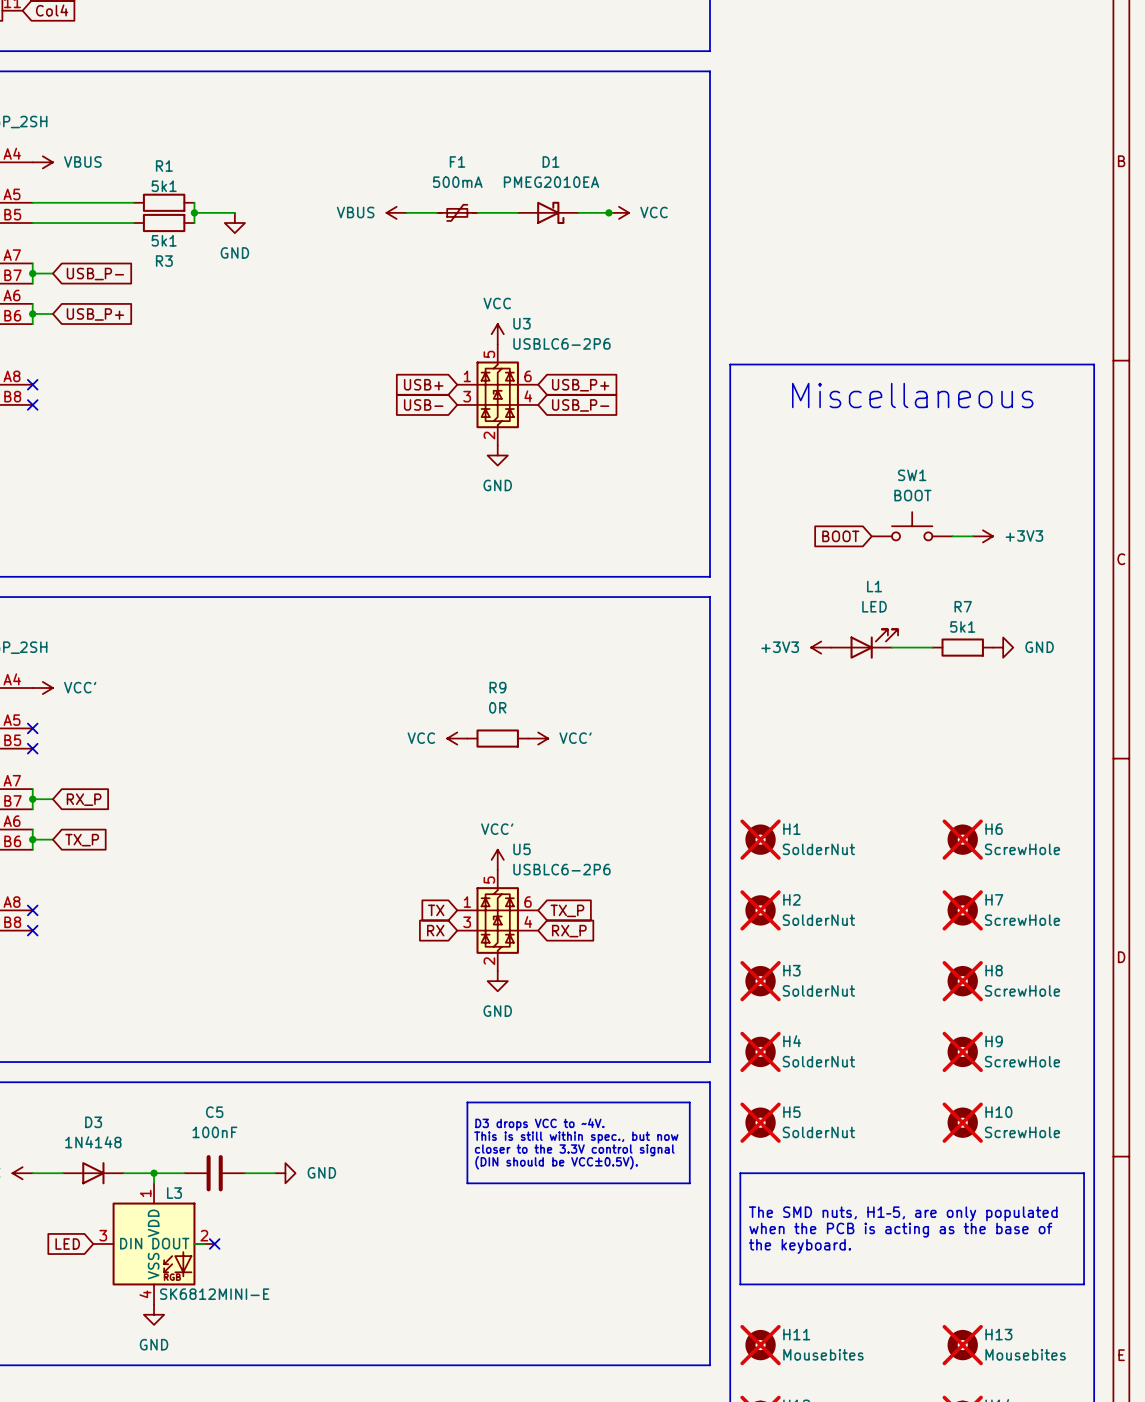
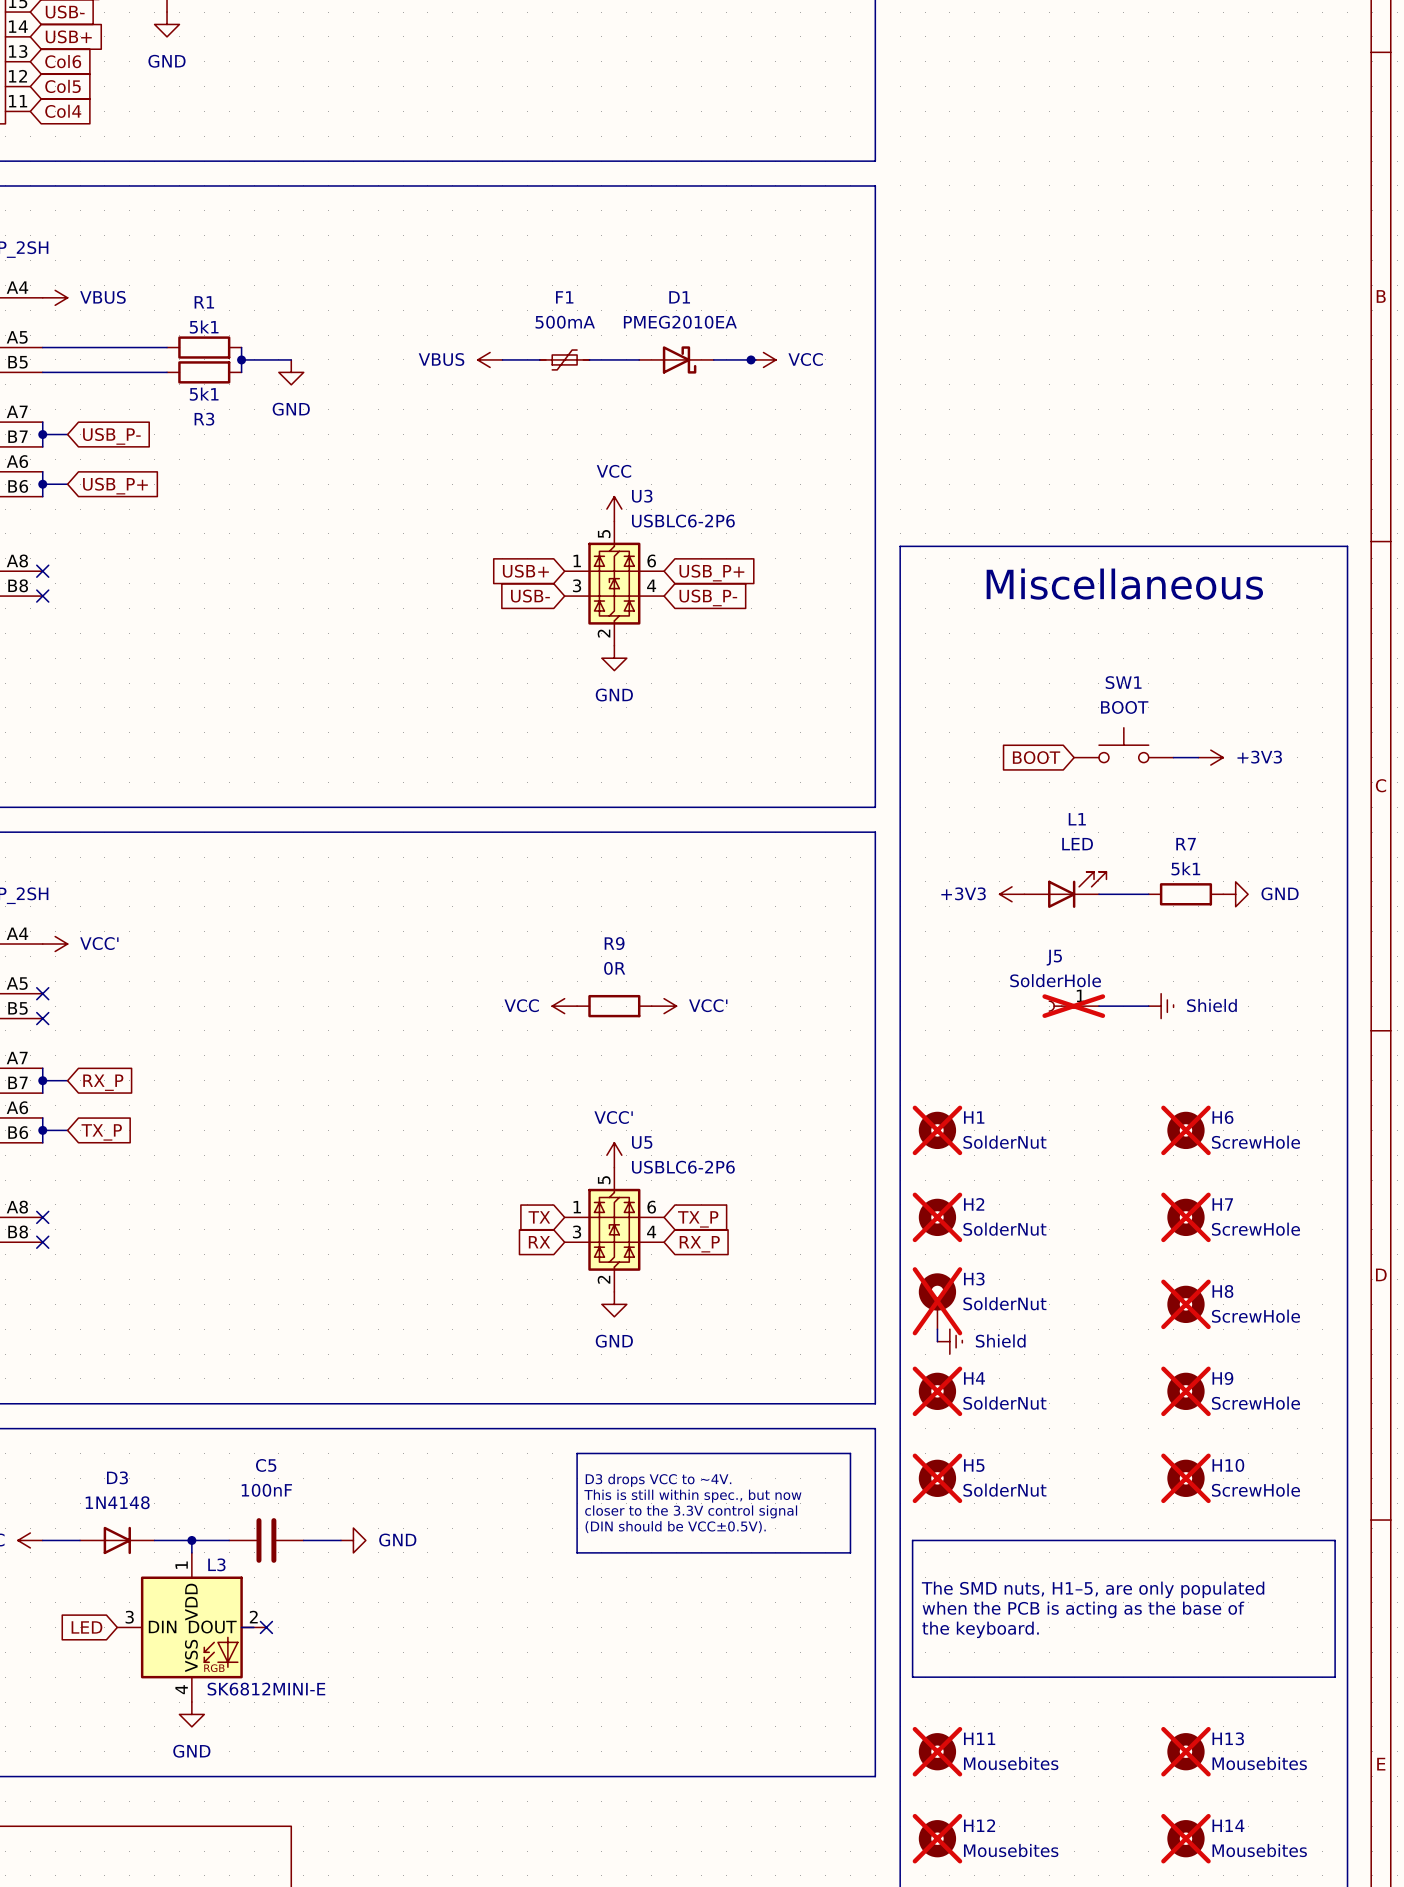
J5: none -> SolderHole (1073, 1006)
wire: none -> (1098, 1006) (1148, 1006)
power symbol: none -> Shield (1161, 1006)
H3 symbol: [745, 966, 776, 997] -> [918, 1273, 957, 1330]
wire: none -> (937, 1329) (937, 1341)
power symbol: none -> Shield (949, 1341)

